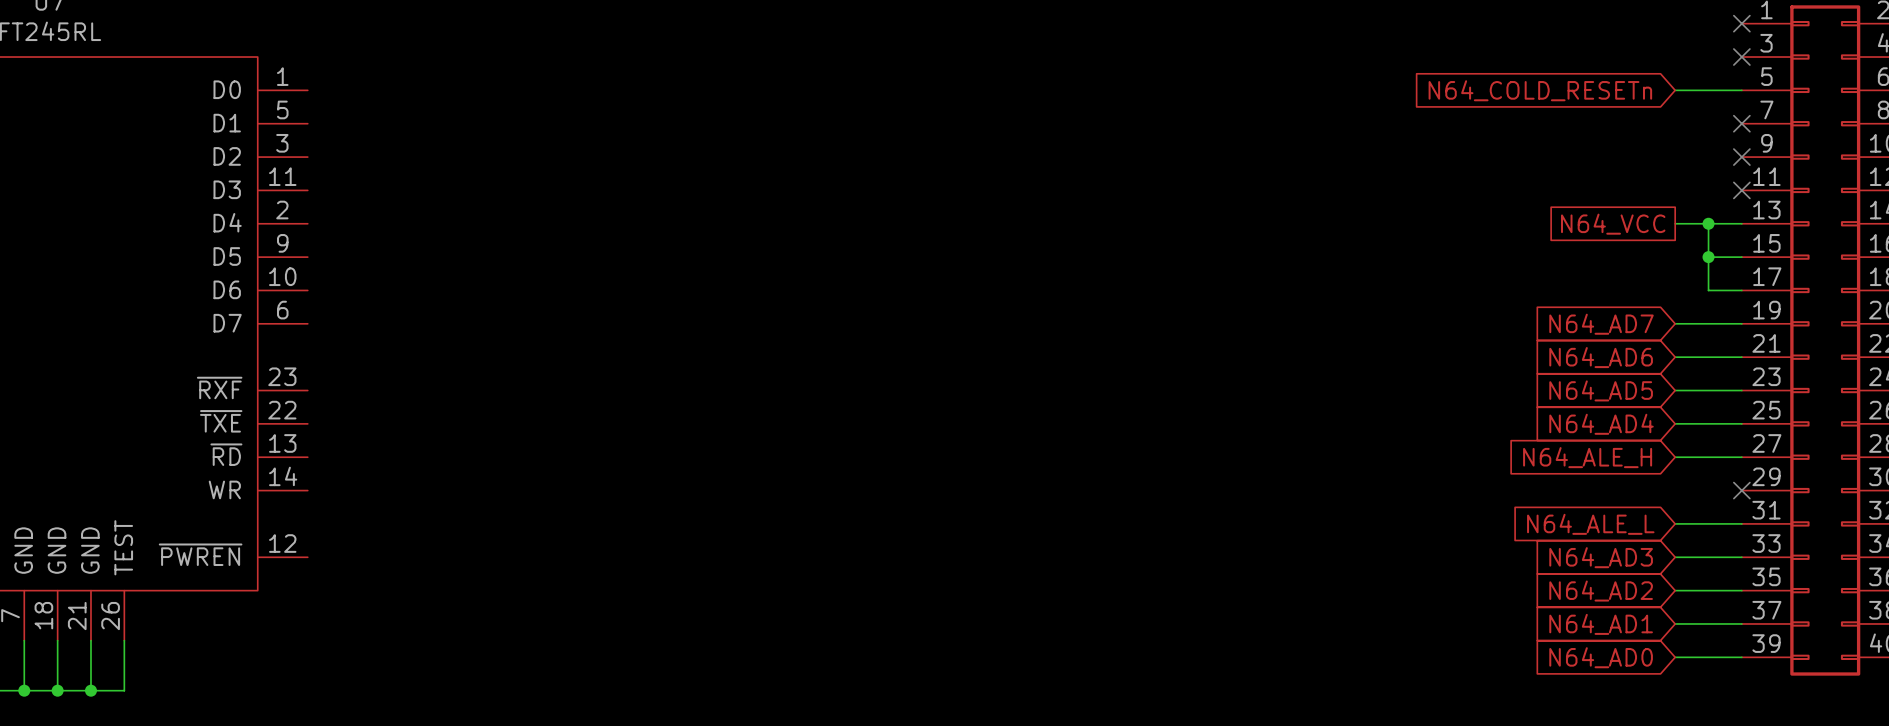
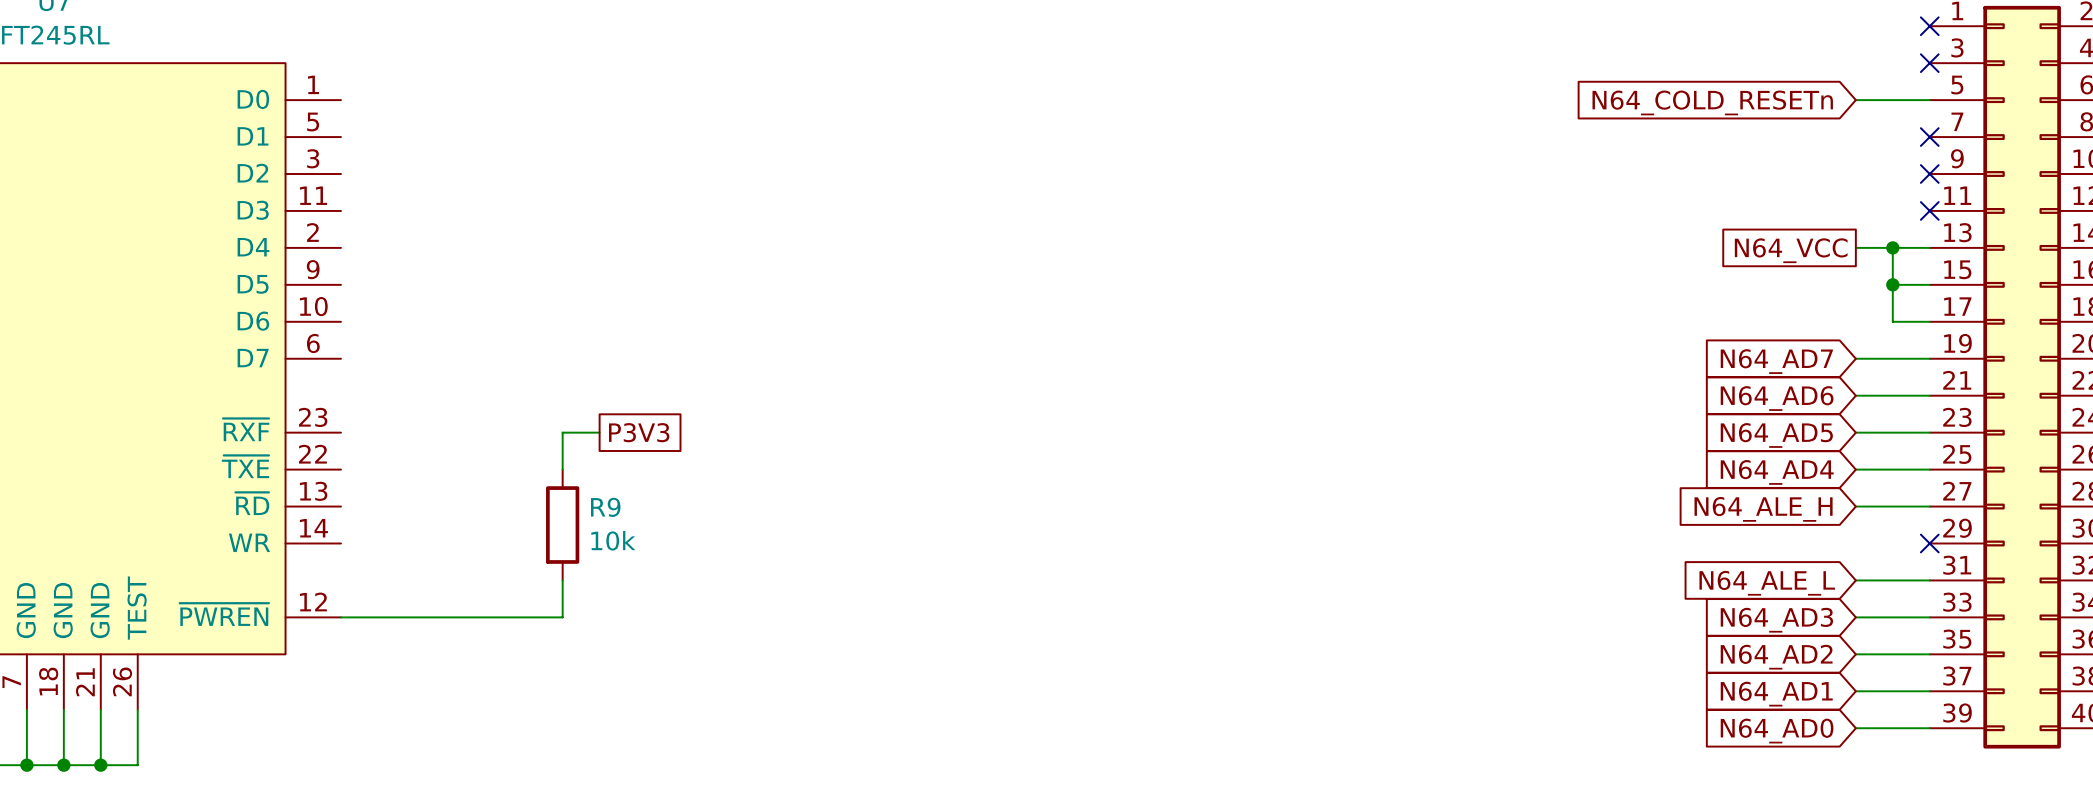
wire: none -> (599, 432) (562, 432) (562, 469)
global label: none -> P3V3 (639, 432)
R9: none -> 10k (562, 525)
wire: none -> (562, 580) (562, 617) (340, 617)

